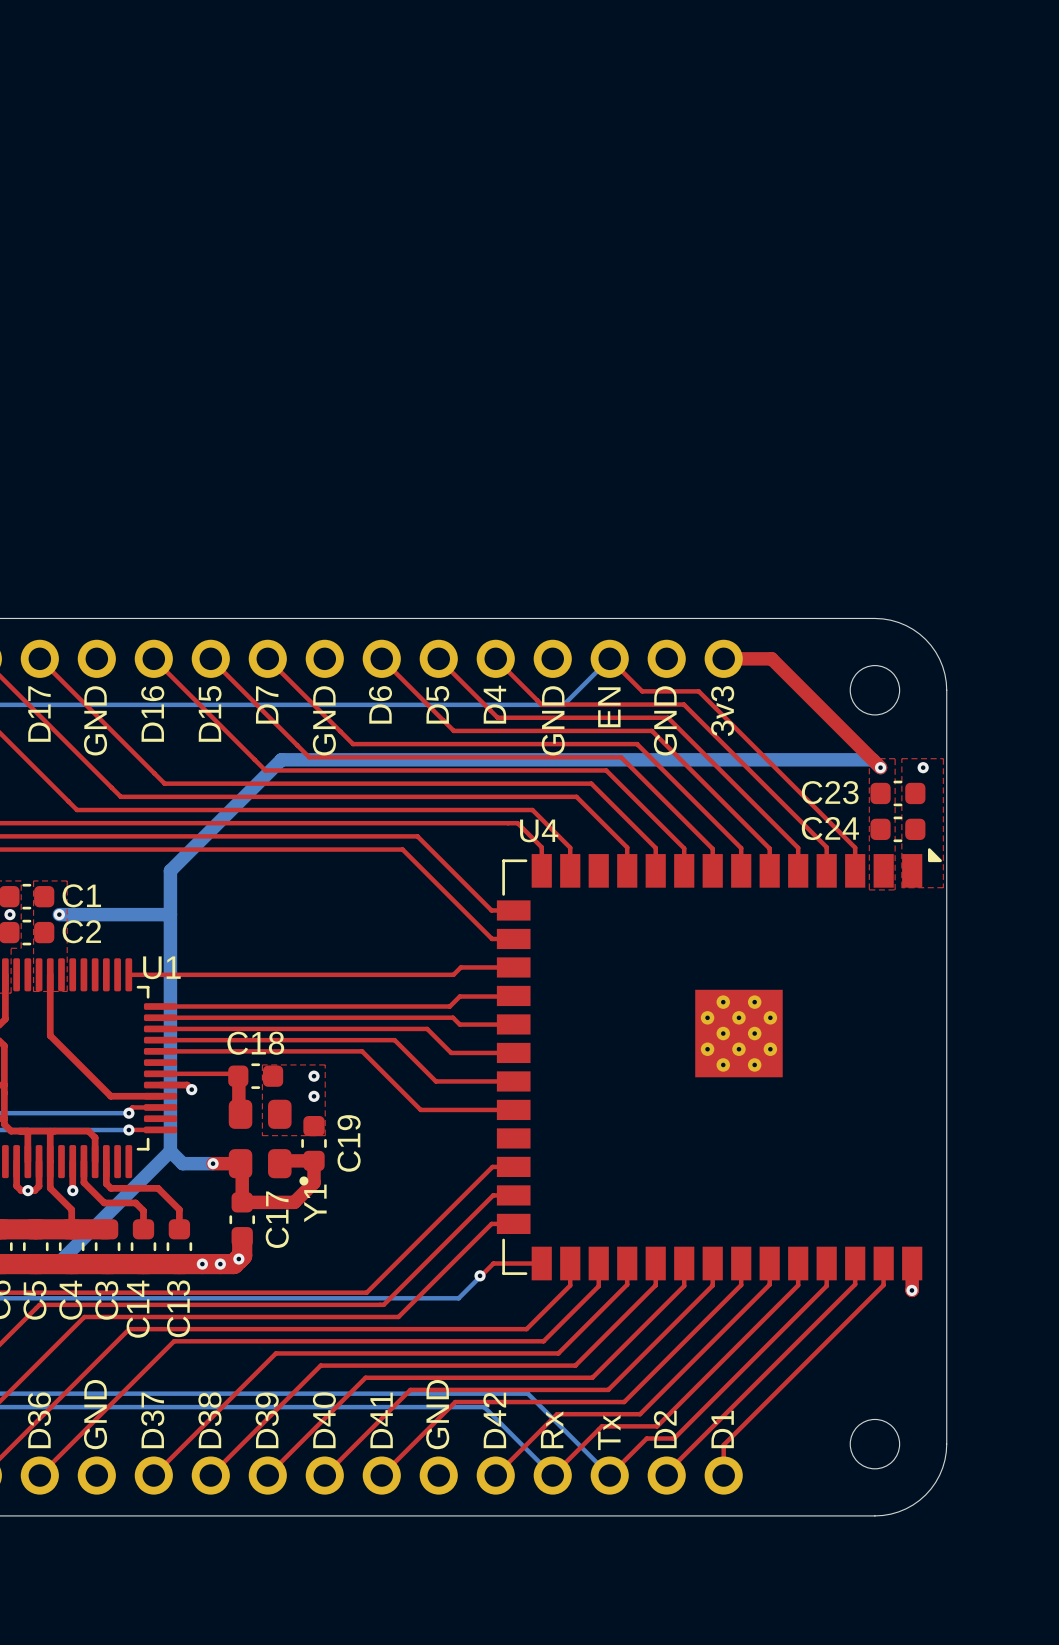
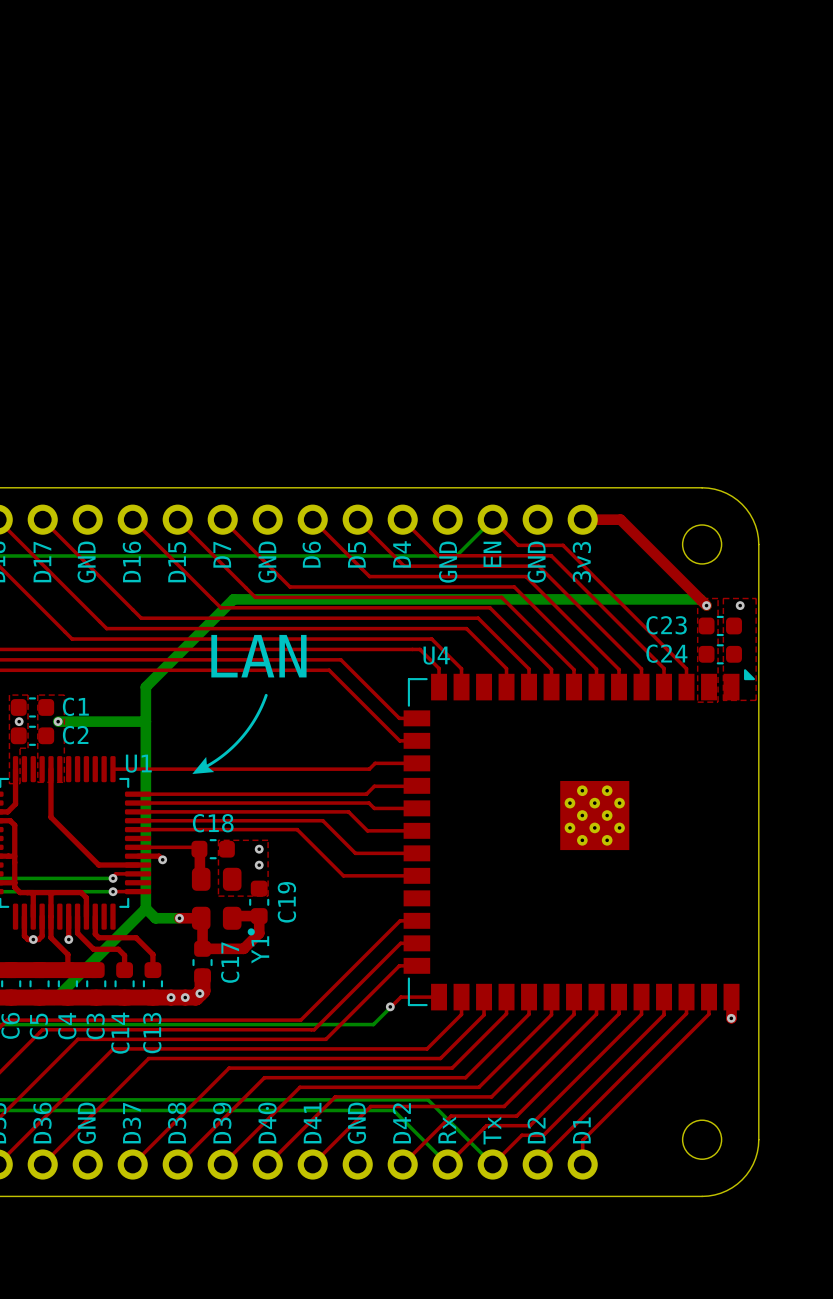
text: none -> LAN (258, 656)
drawing: none -> [192, 693, 268, 774]

